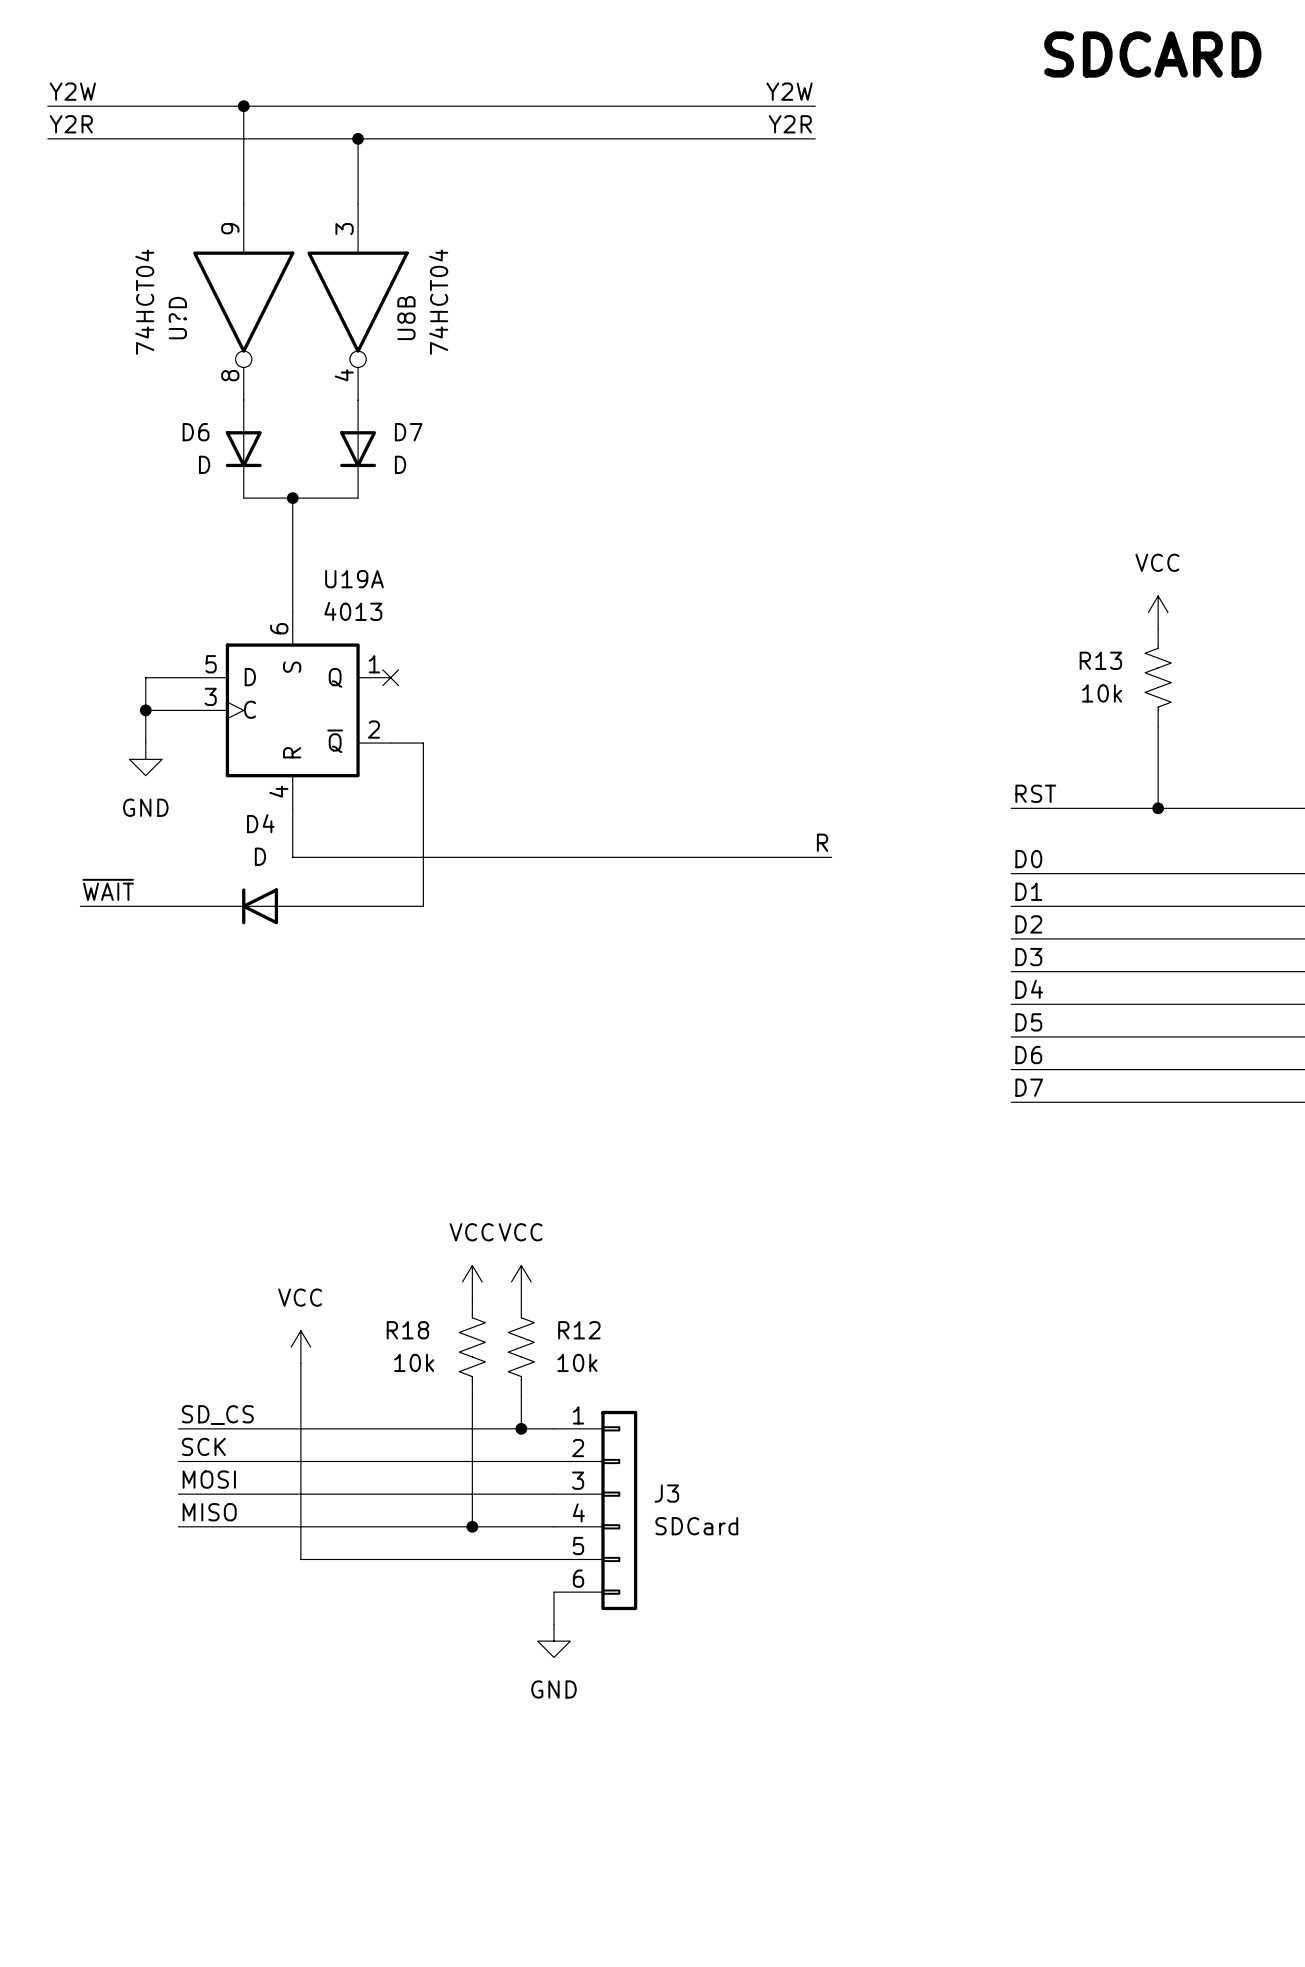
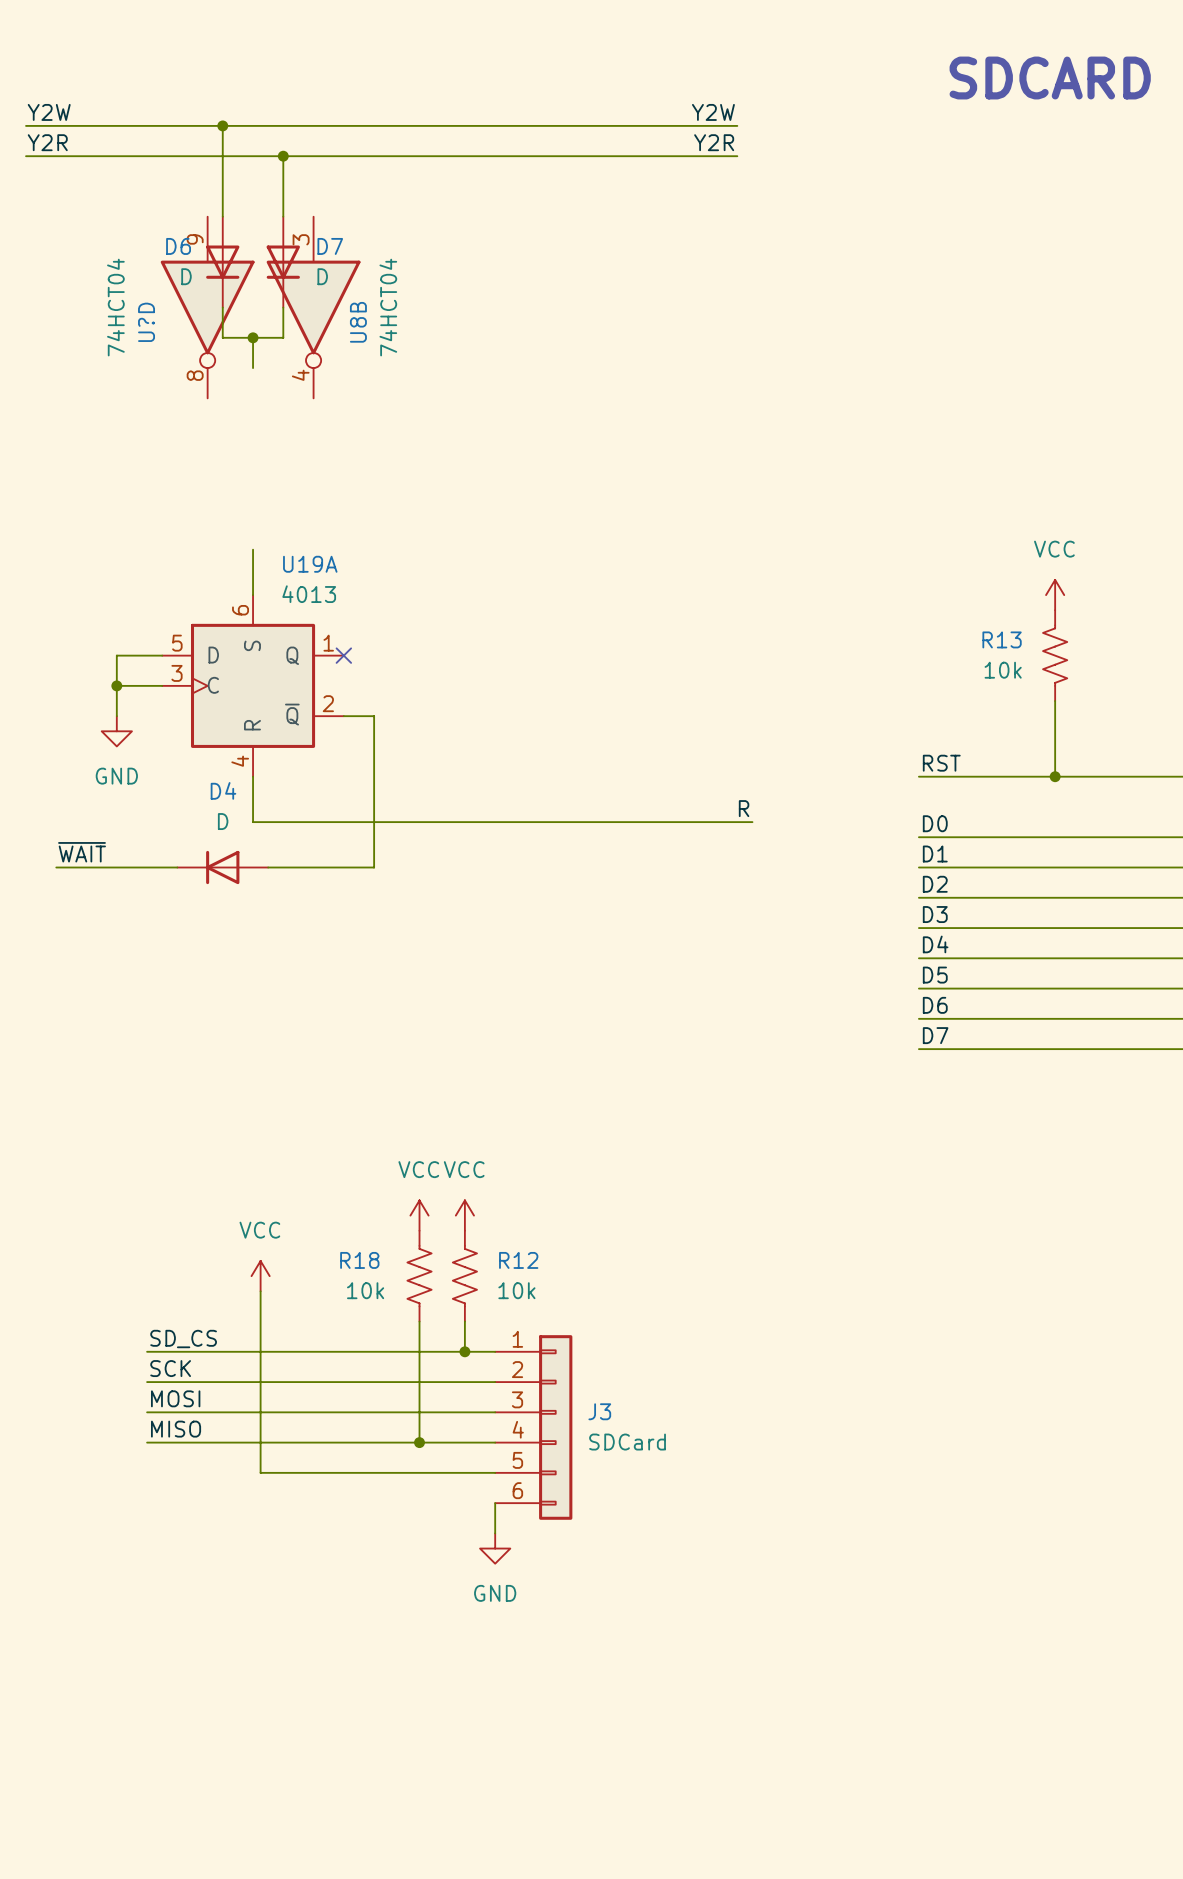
wire: (243, 106) (243, 204) -> (222, 125) (222, 216)
junction position: (243, 106) -> (222, 125)
wire: (358, 138) (358, 204) -> (283, 156) (283, 216)
junction position: (358, 138) -> (283, 156)
wire: none -> (222, 307) (222, 337) (283, 337) (283, 307)
wire: none -> (253, 337) (253, 368)
junction: none -> (253, 337)
D6 position: (243, 449) -> (222, 262)
D7 position: (358, 449) -> (283, 262)
wire: (243, 498) (358, 498) -> none
wire: (292, 498) (292, 563) -> none
junction: (292, 498) -> none

